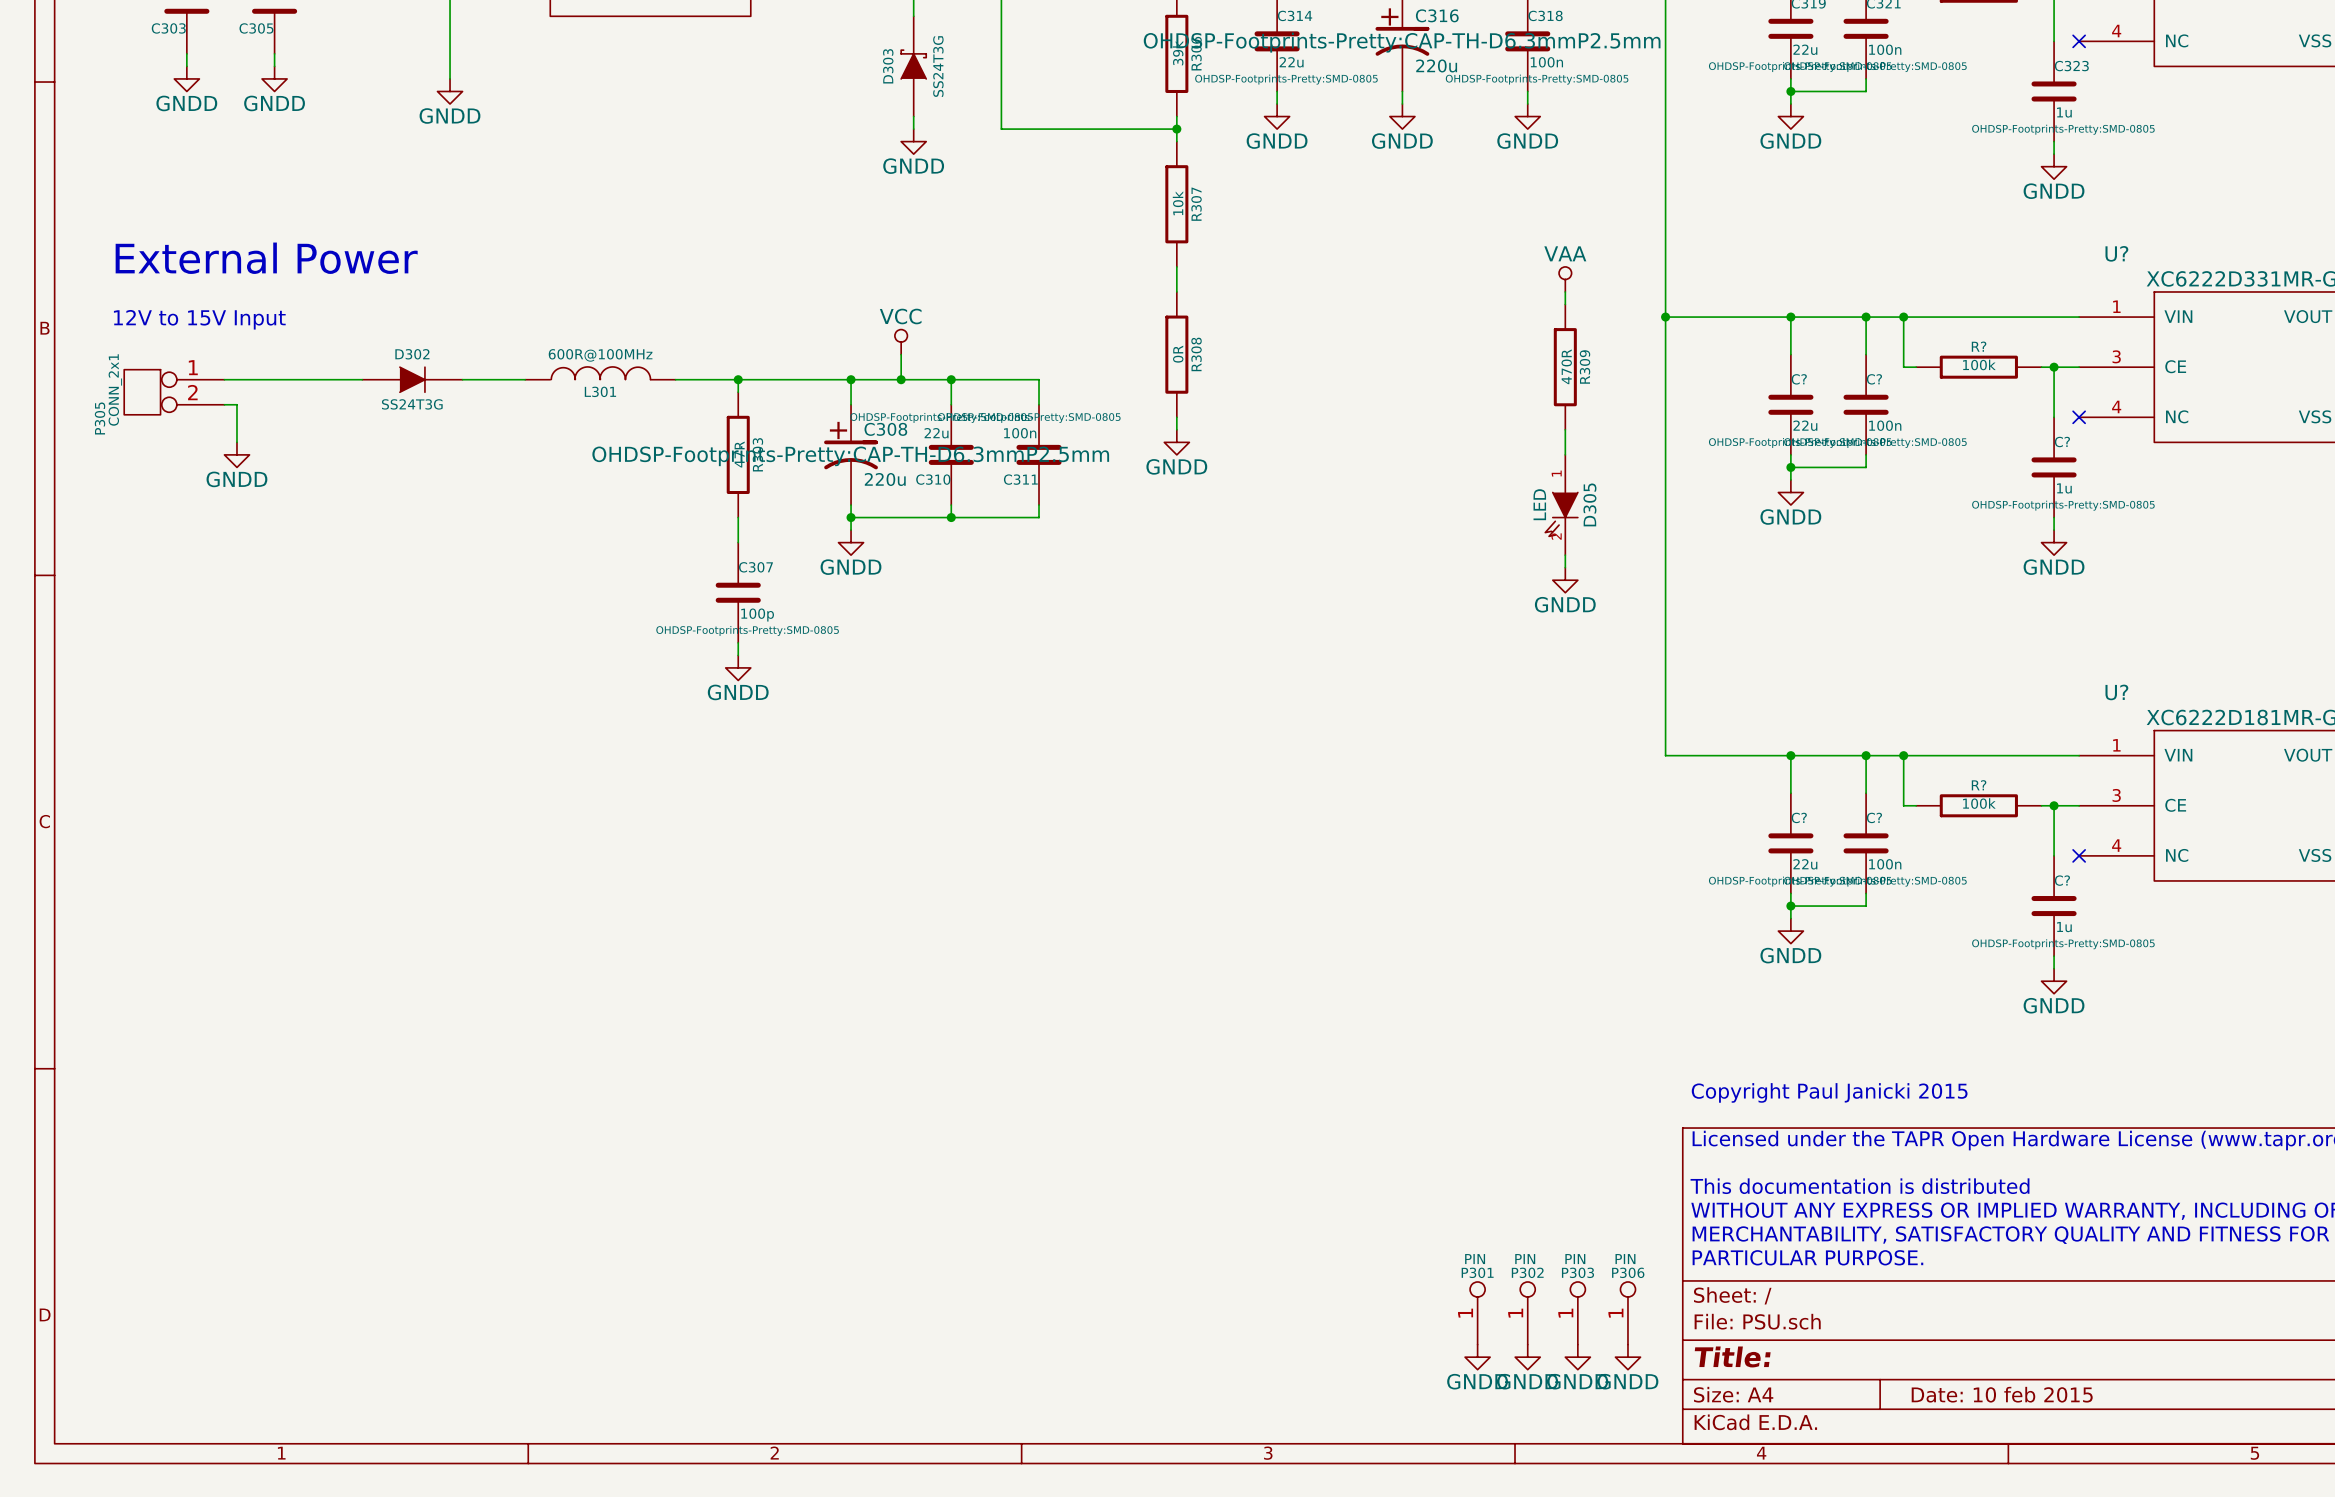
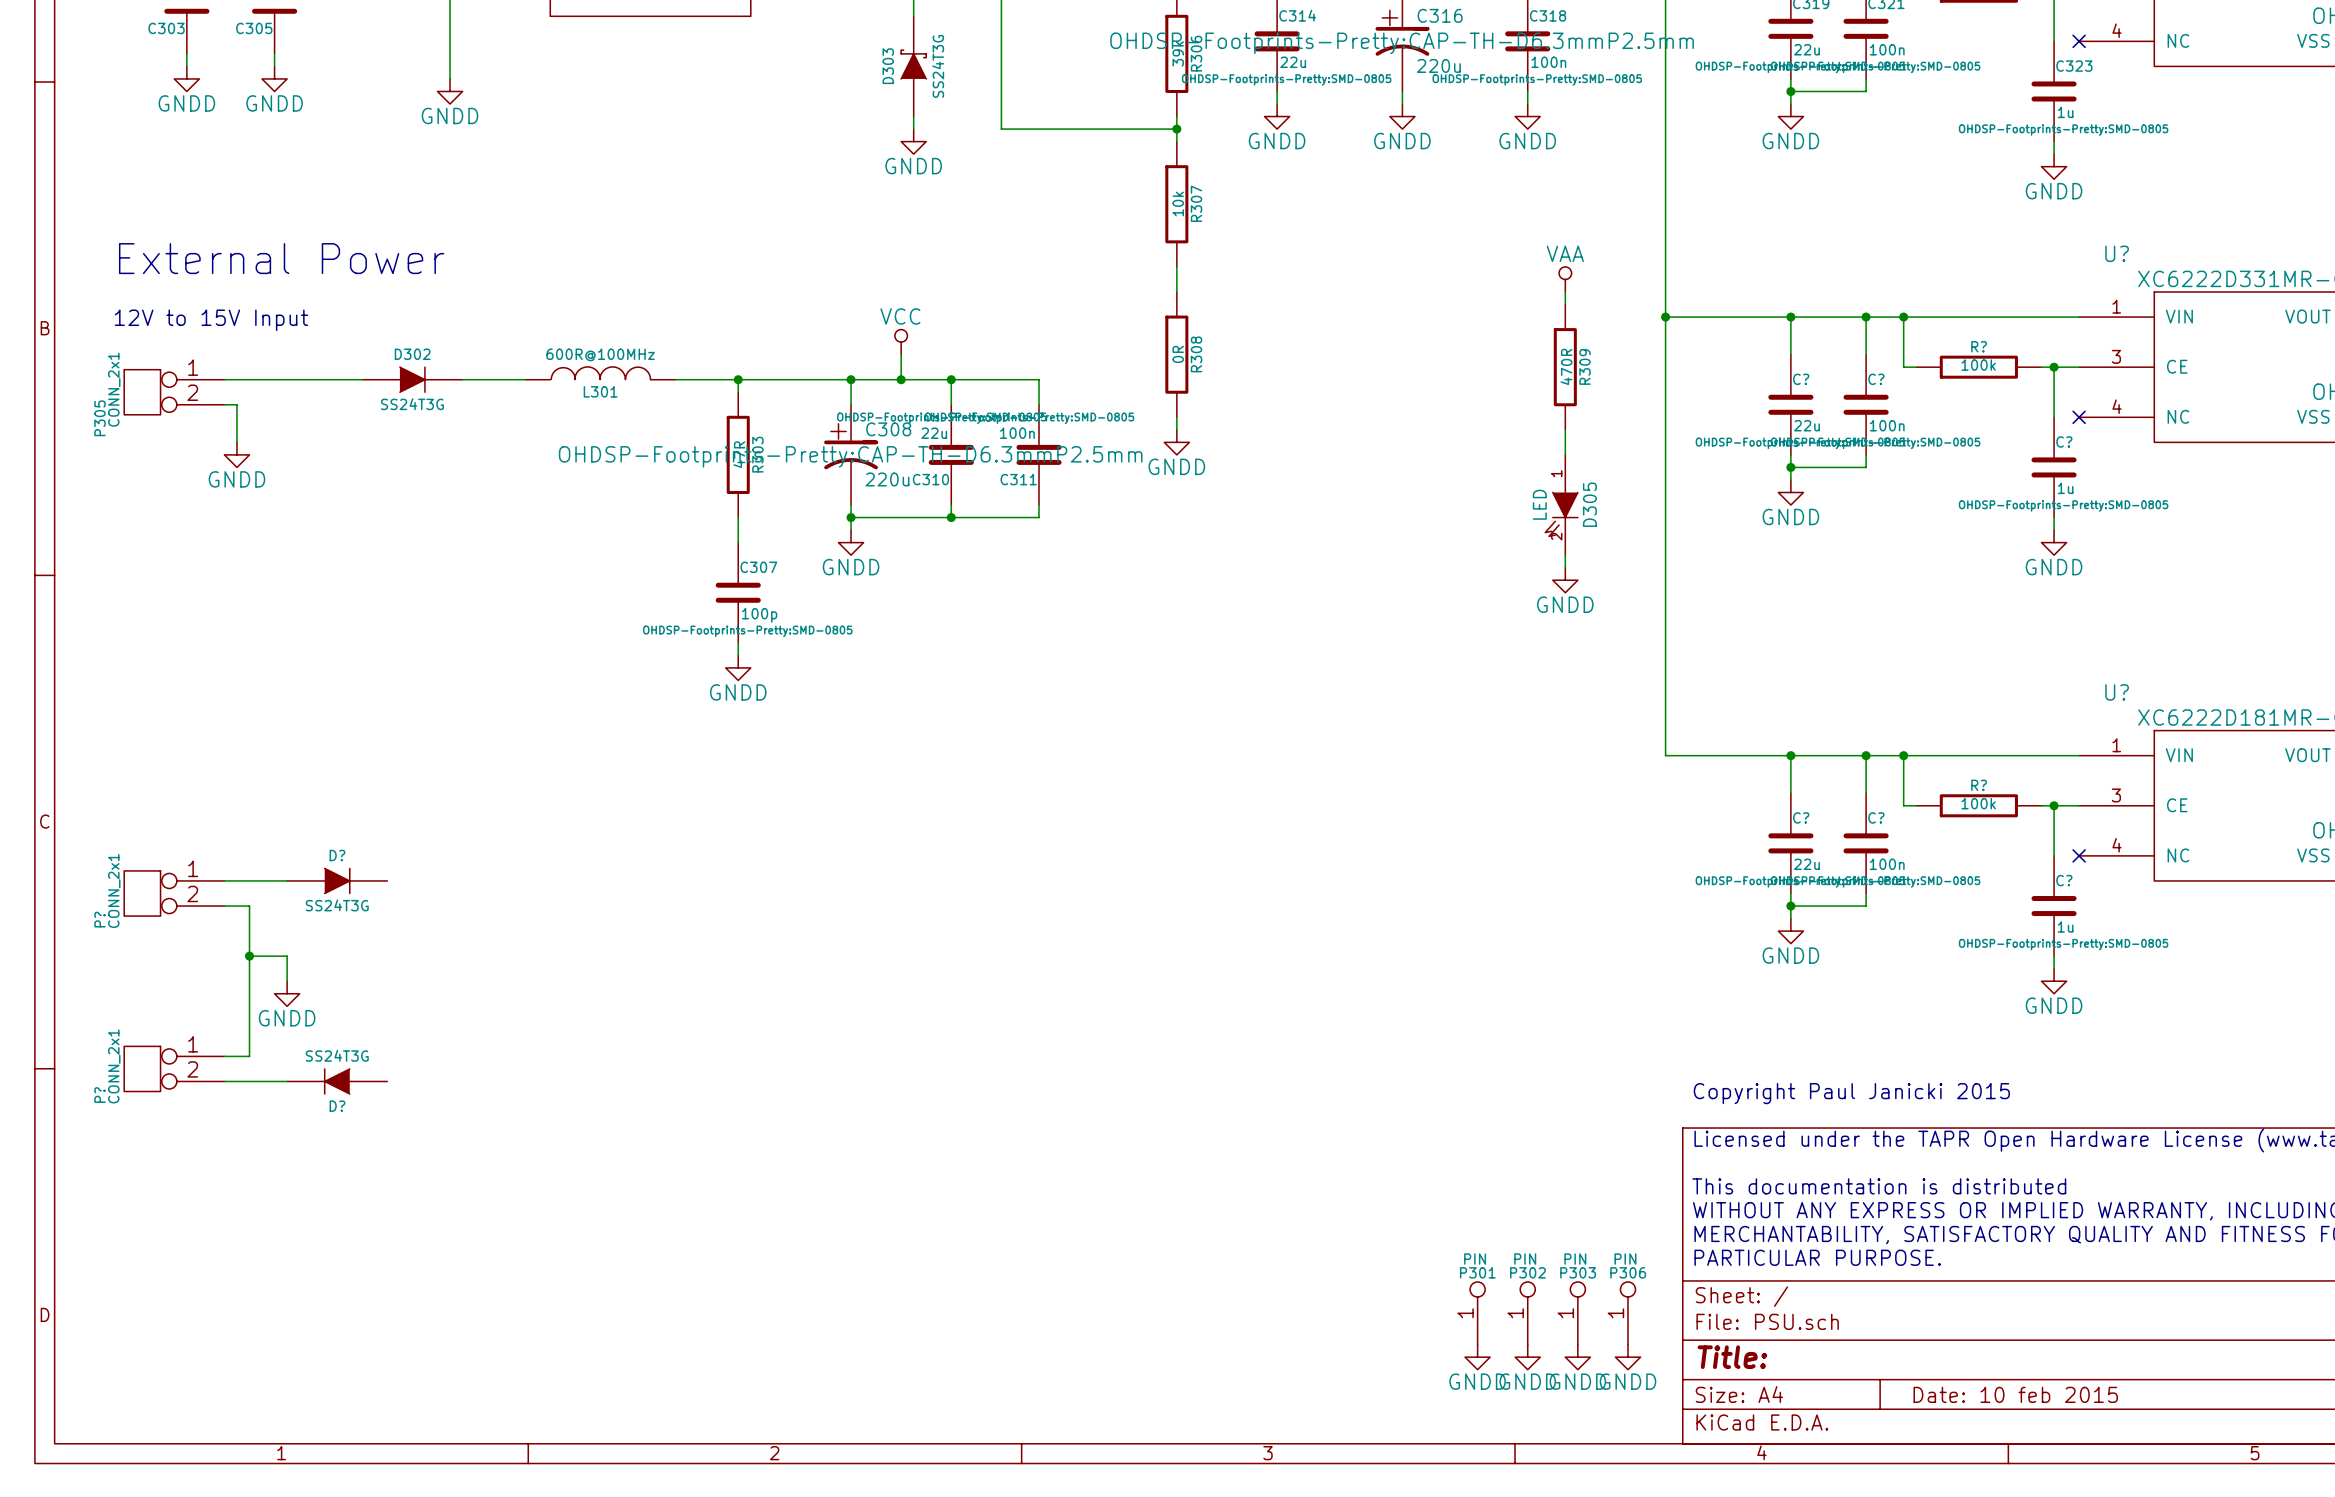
wire: none -> (224, 880) (287, 880)
D?: none -> SS24T3G (337, 880)
P?: none -> CONN_2x1 (174, 893)
wire: none -> (224, 906) (249, 906) (249, 1056) (224, 1056)
wire: none -> (249, 956) (287, 956) (287, 981)
junction: none -> (249, 956)
power symbol: none -> GNDD (287, 993)
P?: none -> CONN_2x1 (174, 1068)
wire: none -> (224, 1081) (287, 1081)
D?: none -> SS24T3G (337, 1081)

